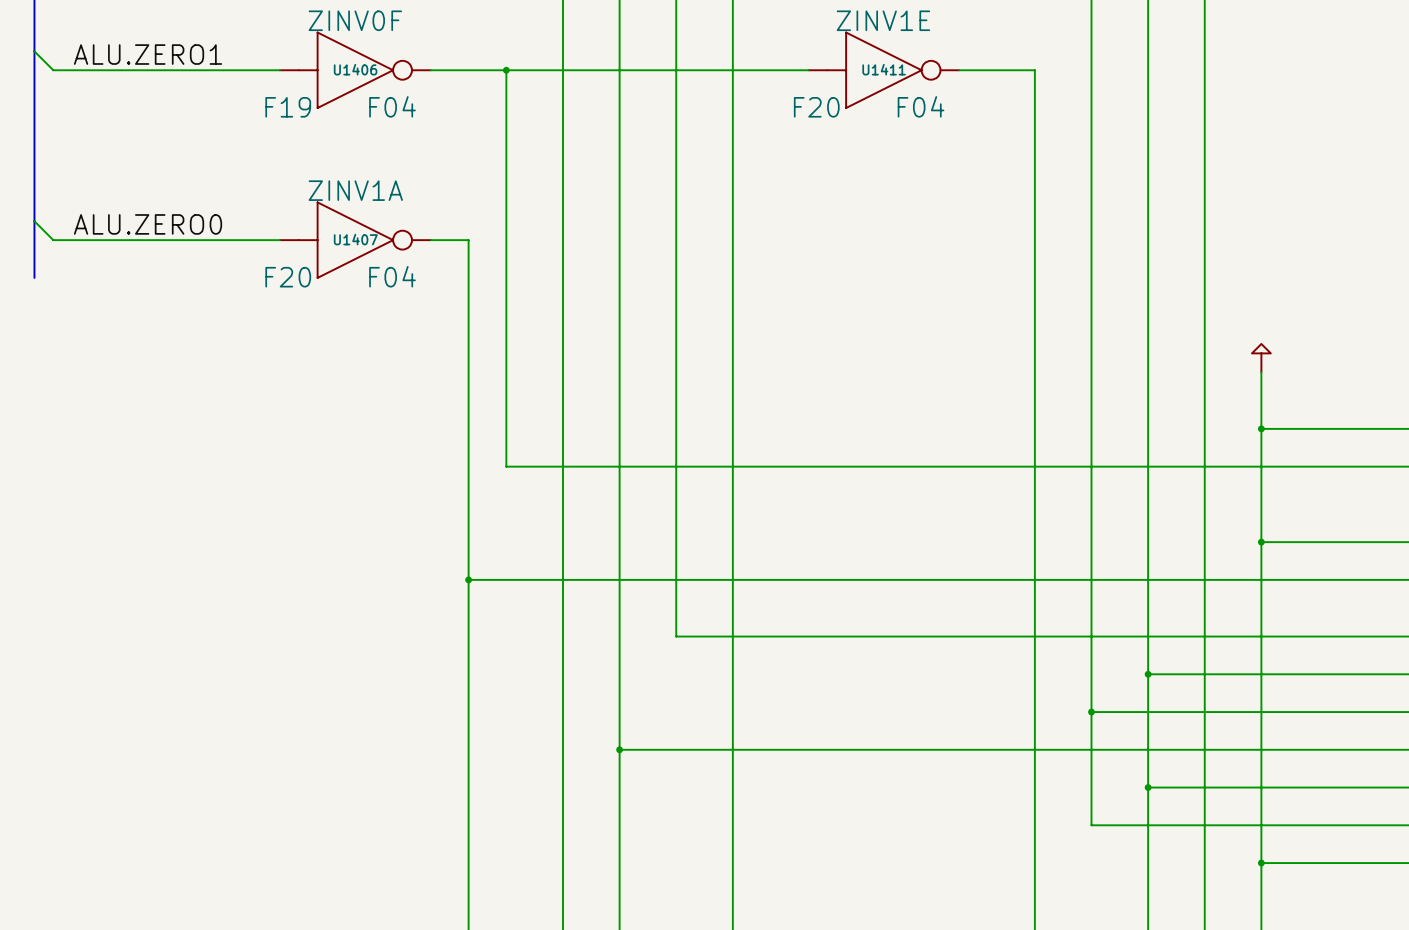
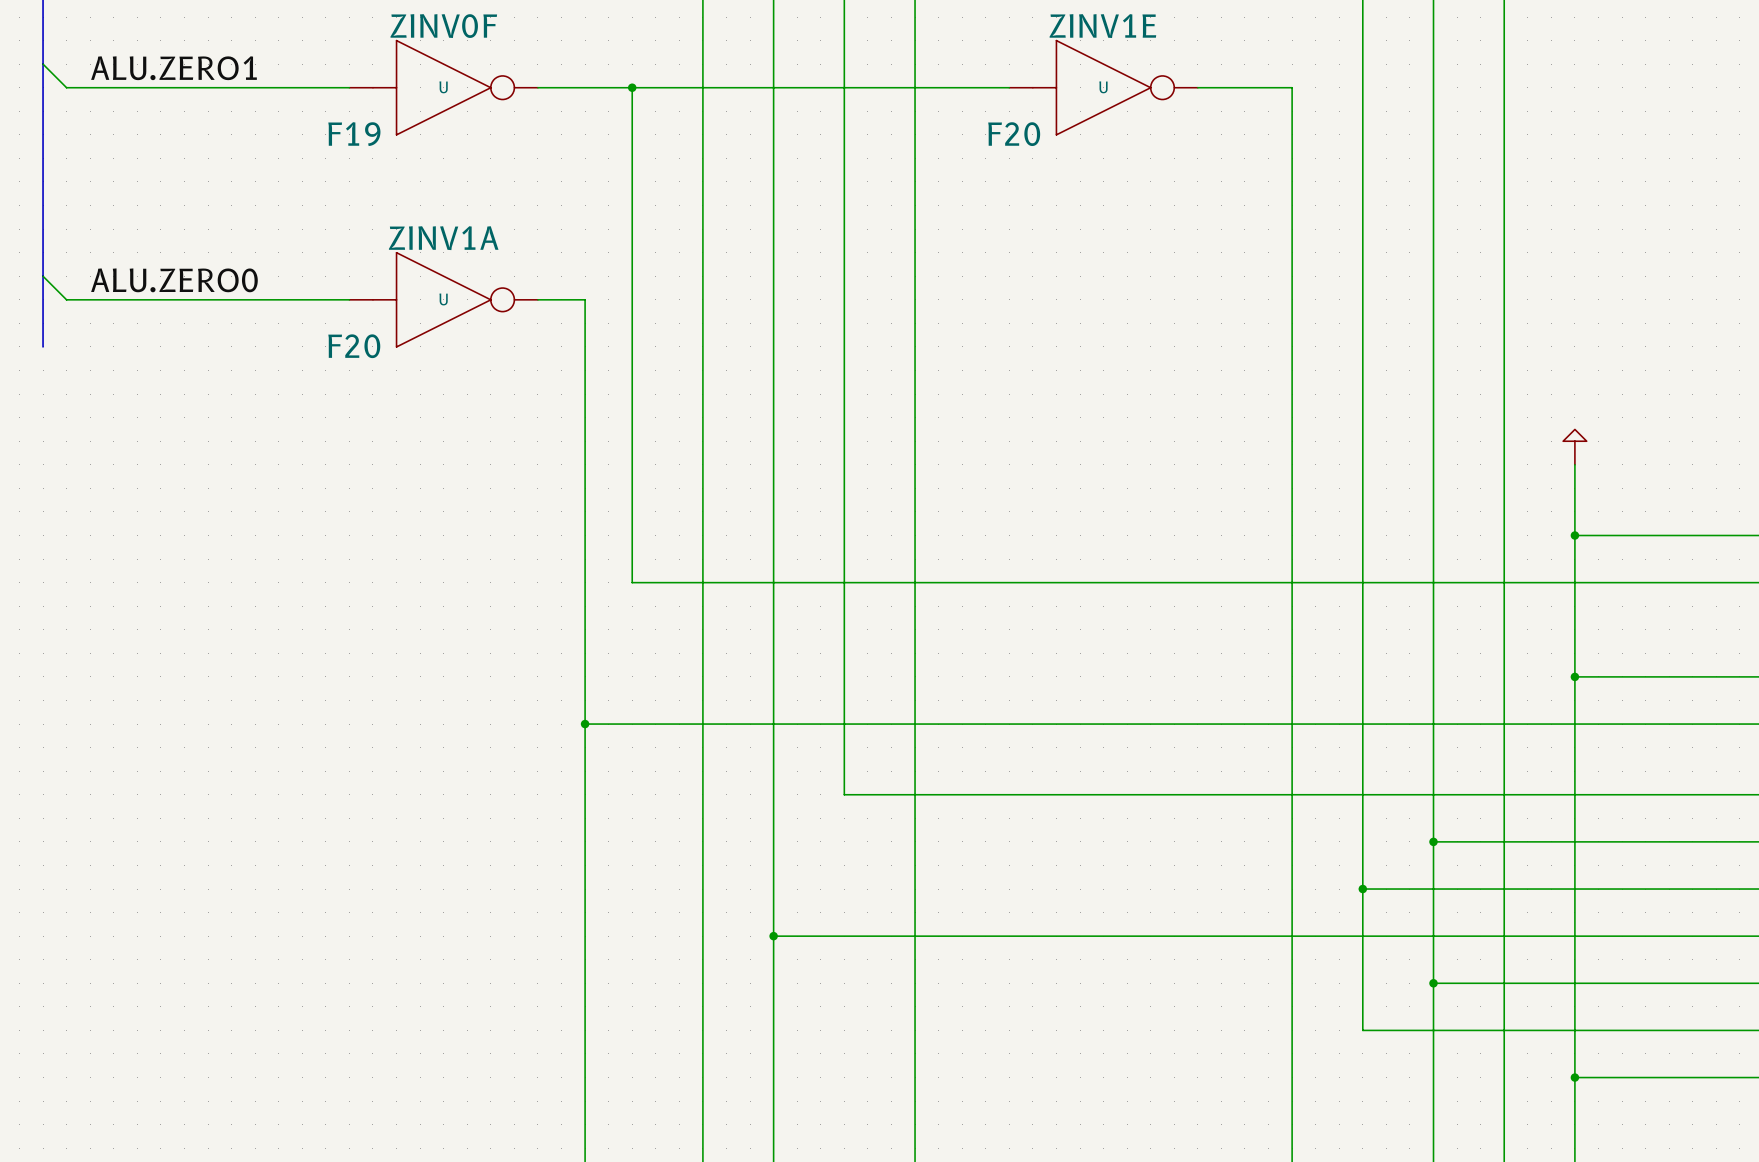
U1406 name: U1406 (355, 69) -> U (443, 87)
U1411 name: U1411 (884, 69) -> U (1103, 87)
U1406 value: F04 (392, 106) -> none
U1411 value: F04 (921, 106) -> none
U1407 name: U1407 (355, 239) -> U (443, 299)
U1407 value: F04 (392, 276) -> none

